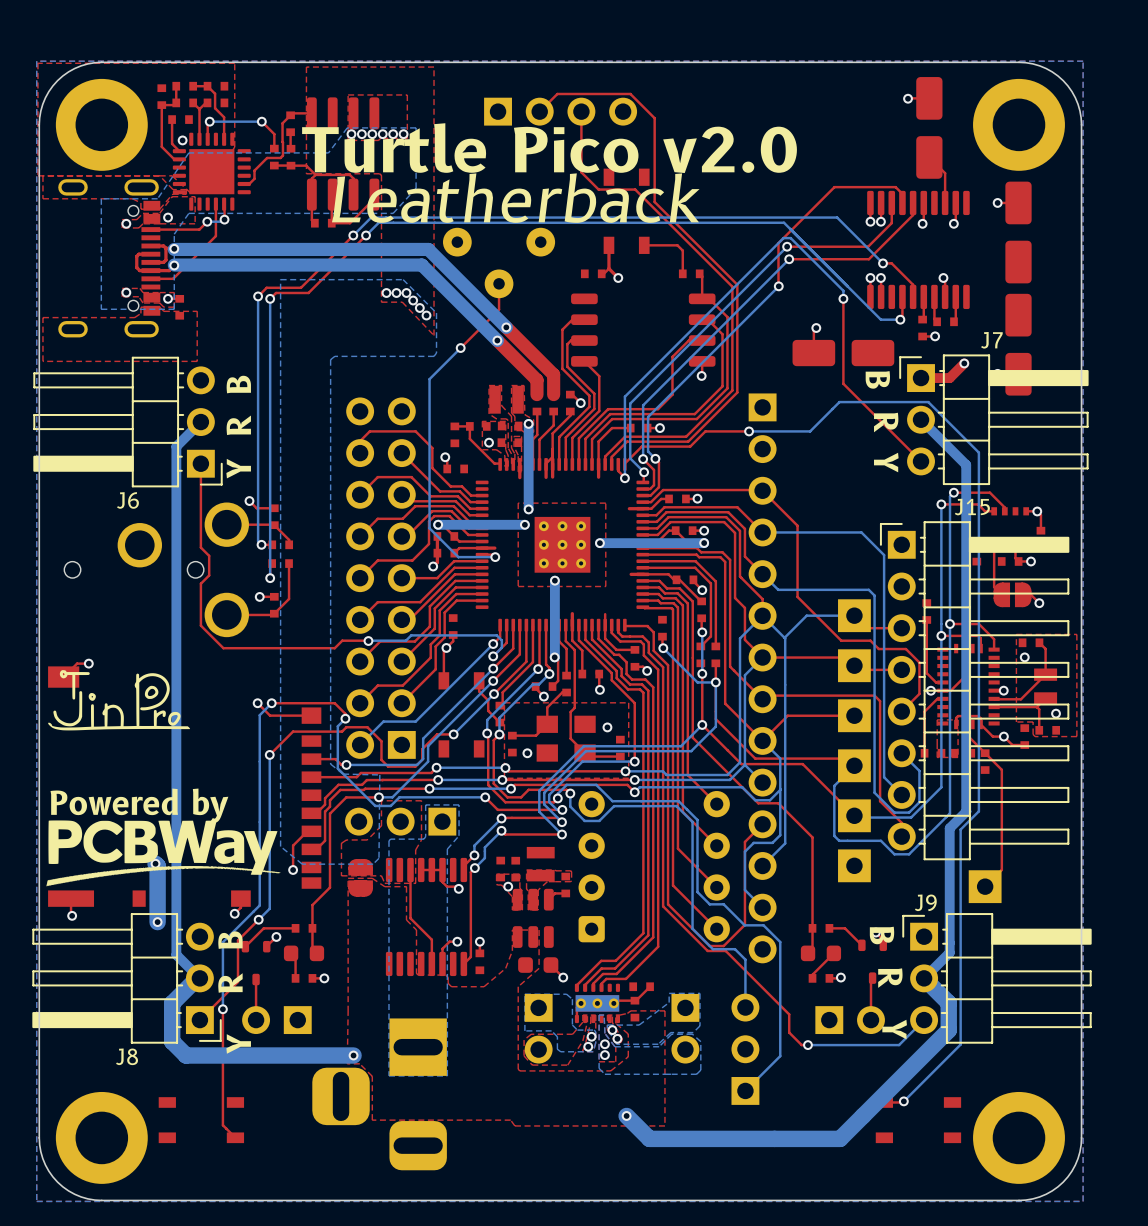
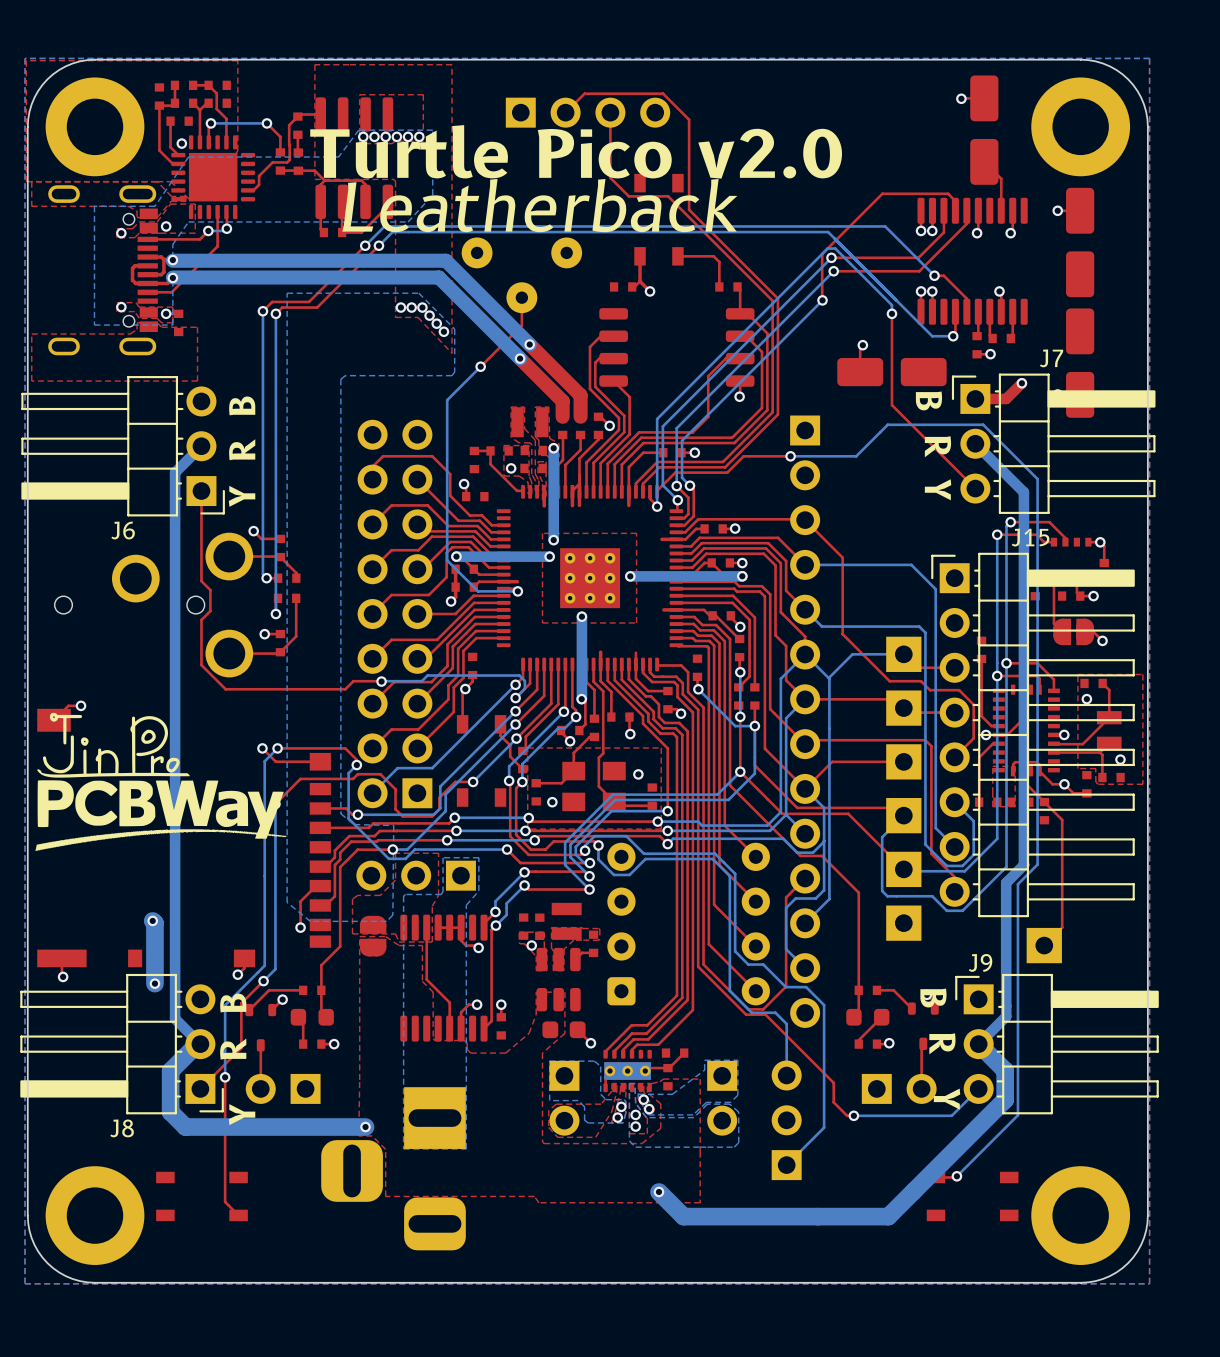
text: Powered by (139, 805) -> none
drawing position: (163, 853) -> (161, 815)

